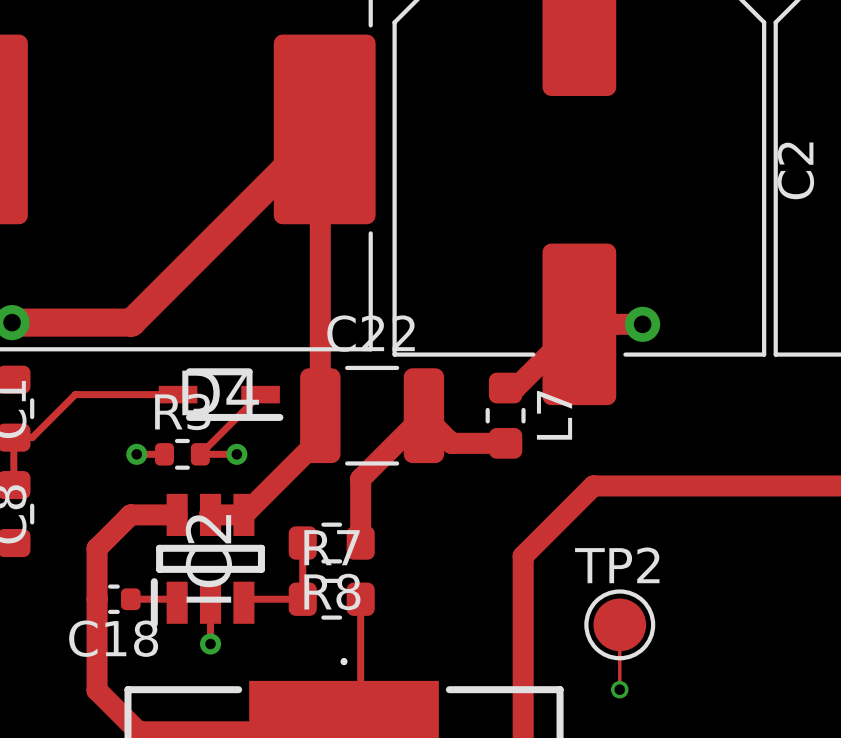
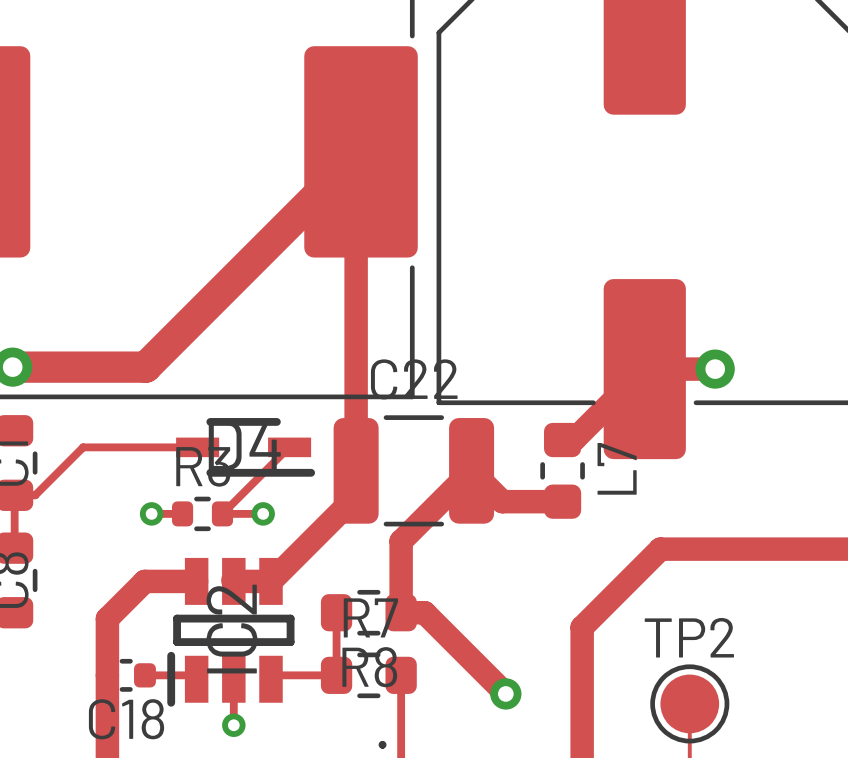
track: none -> (401, 612) (424, 612) (505, 693)
via: none -> (505, 693)

